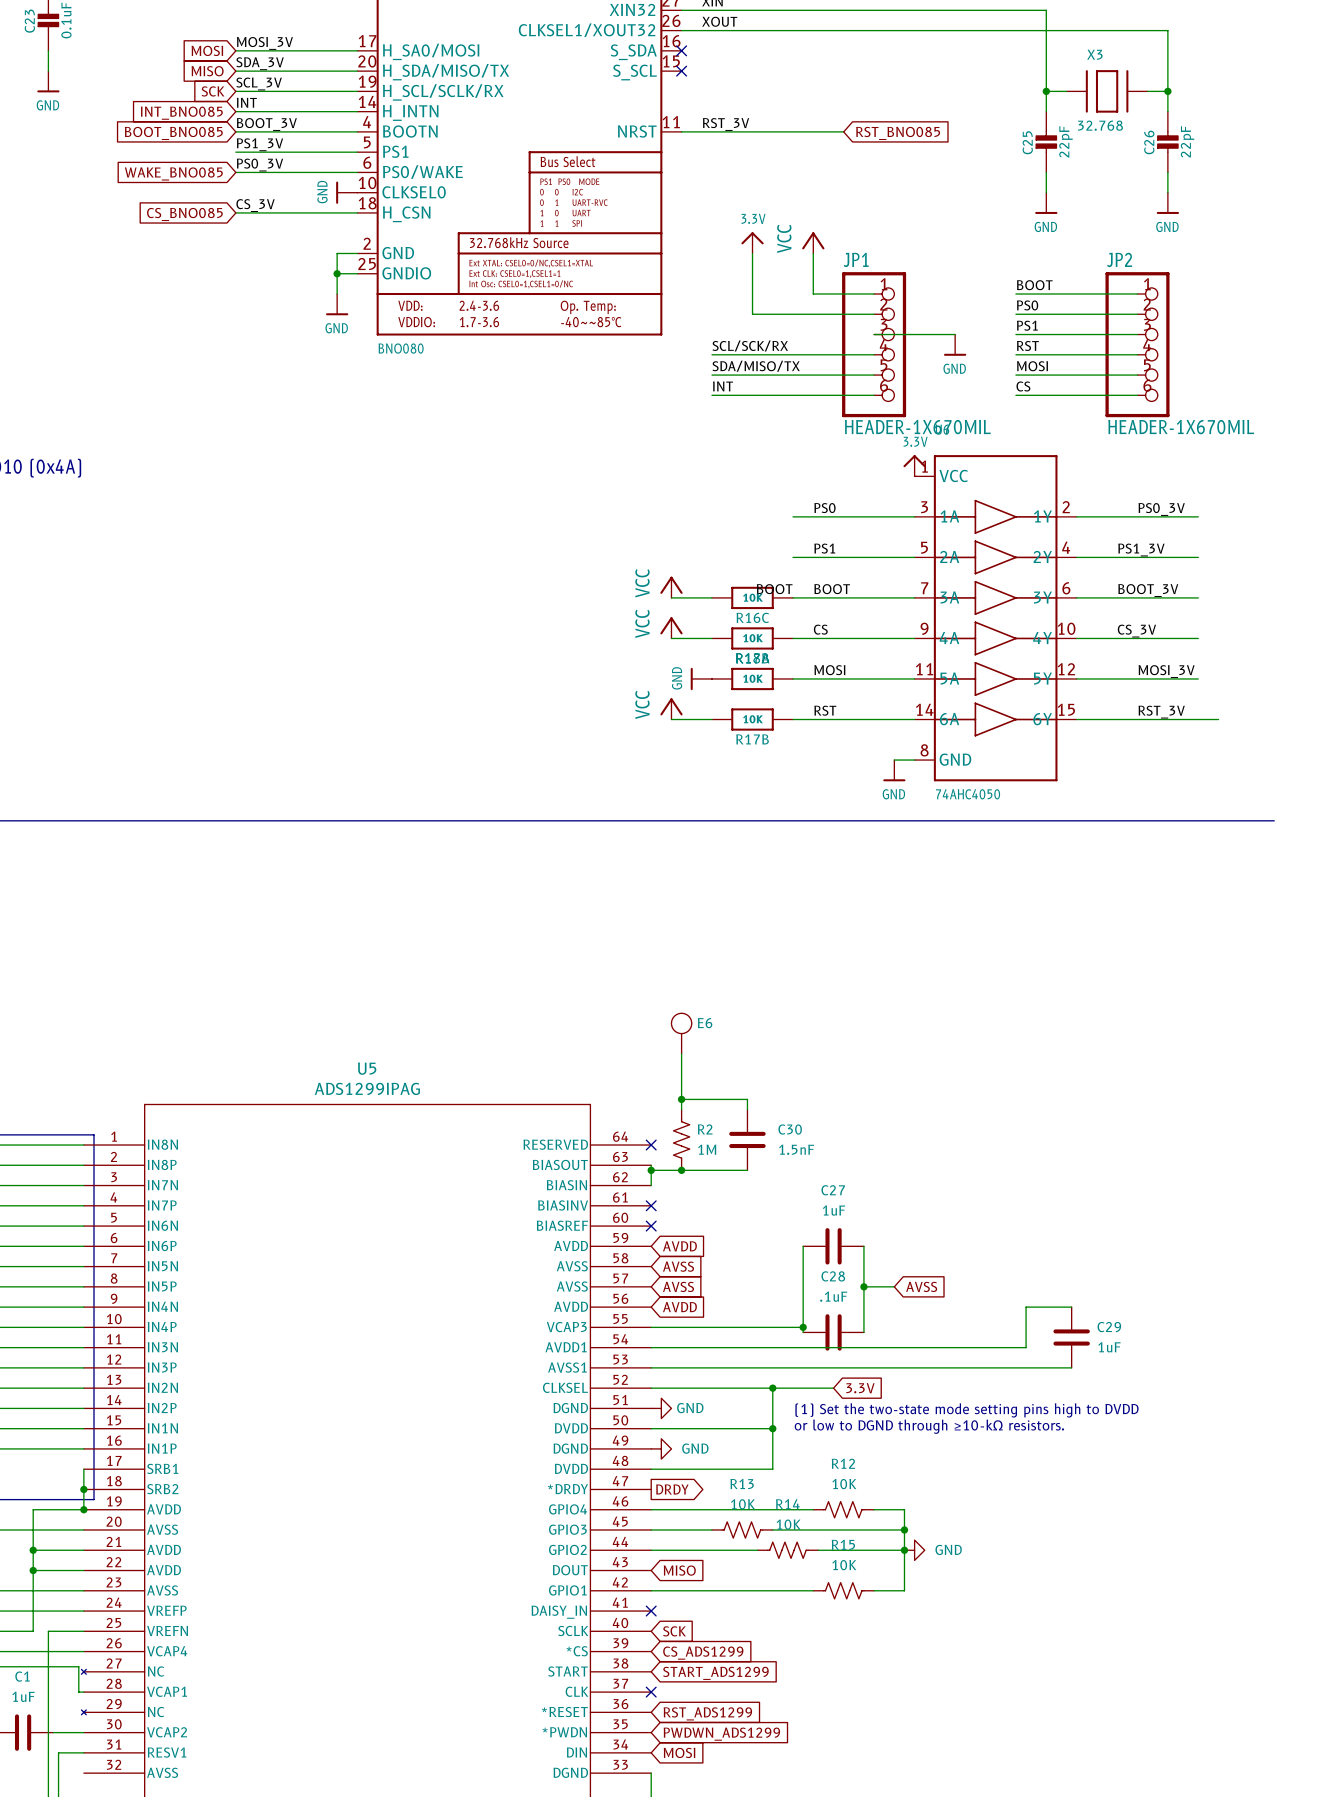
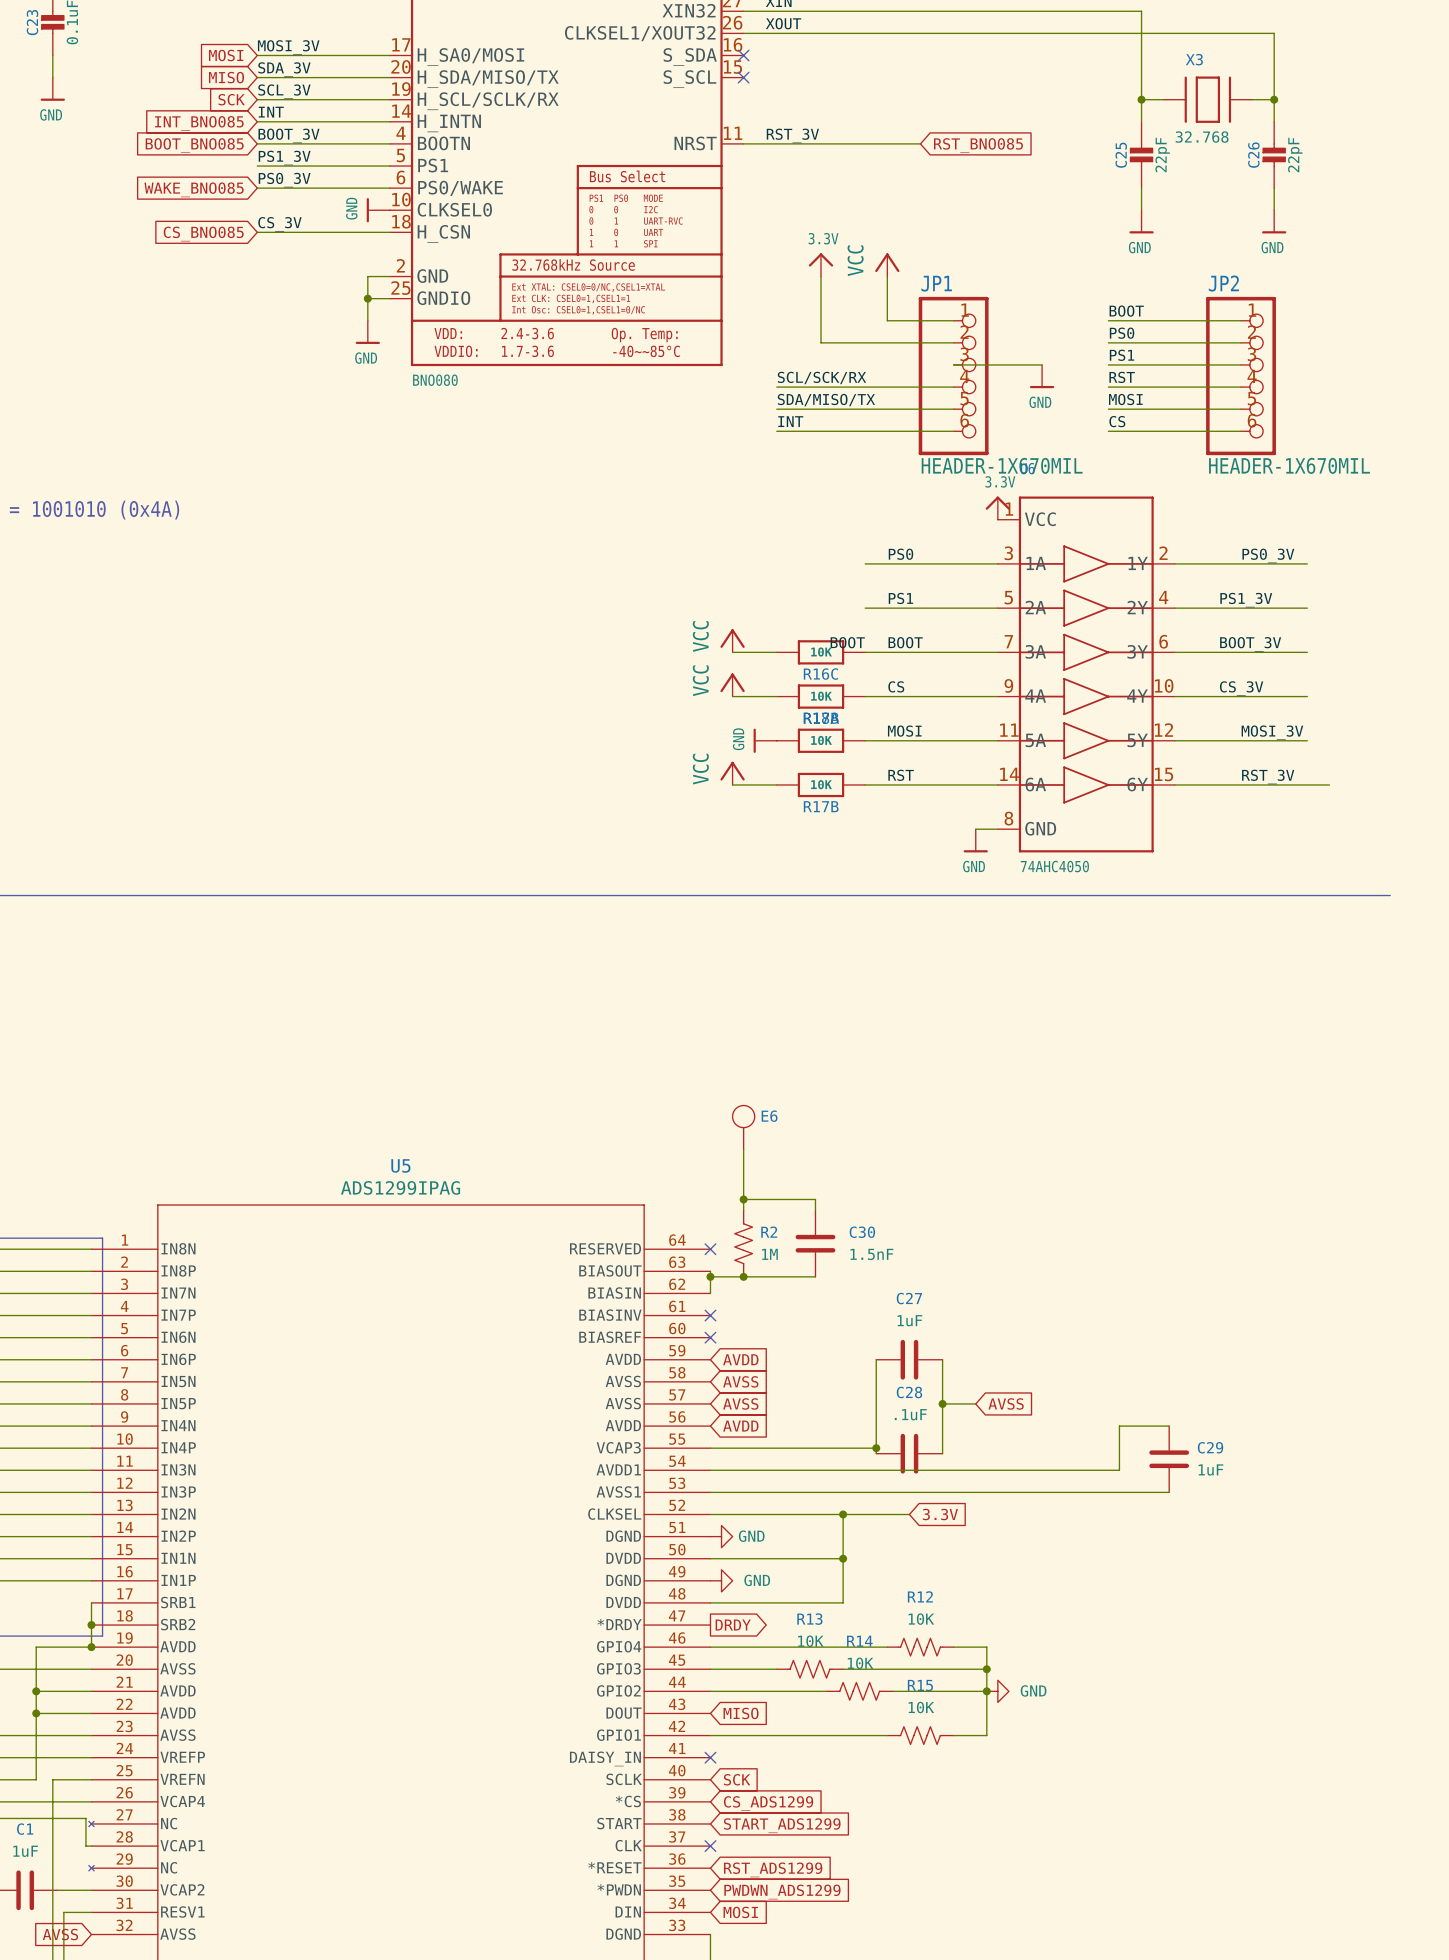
text: (1) Set the two-state mode setting pins high to DVDD (966, 1410) -> none
text: or low to DGND through ≥10-kΩ resistors. (929, 1426) -> none
global label: none -> AVSS (60, 1934)

